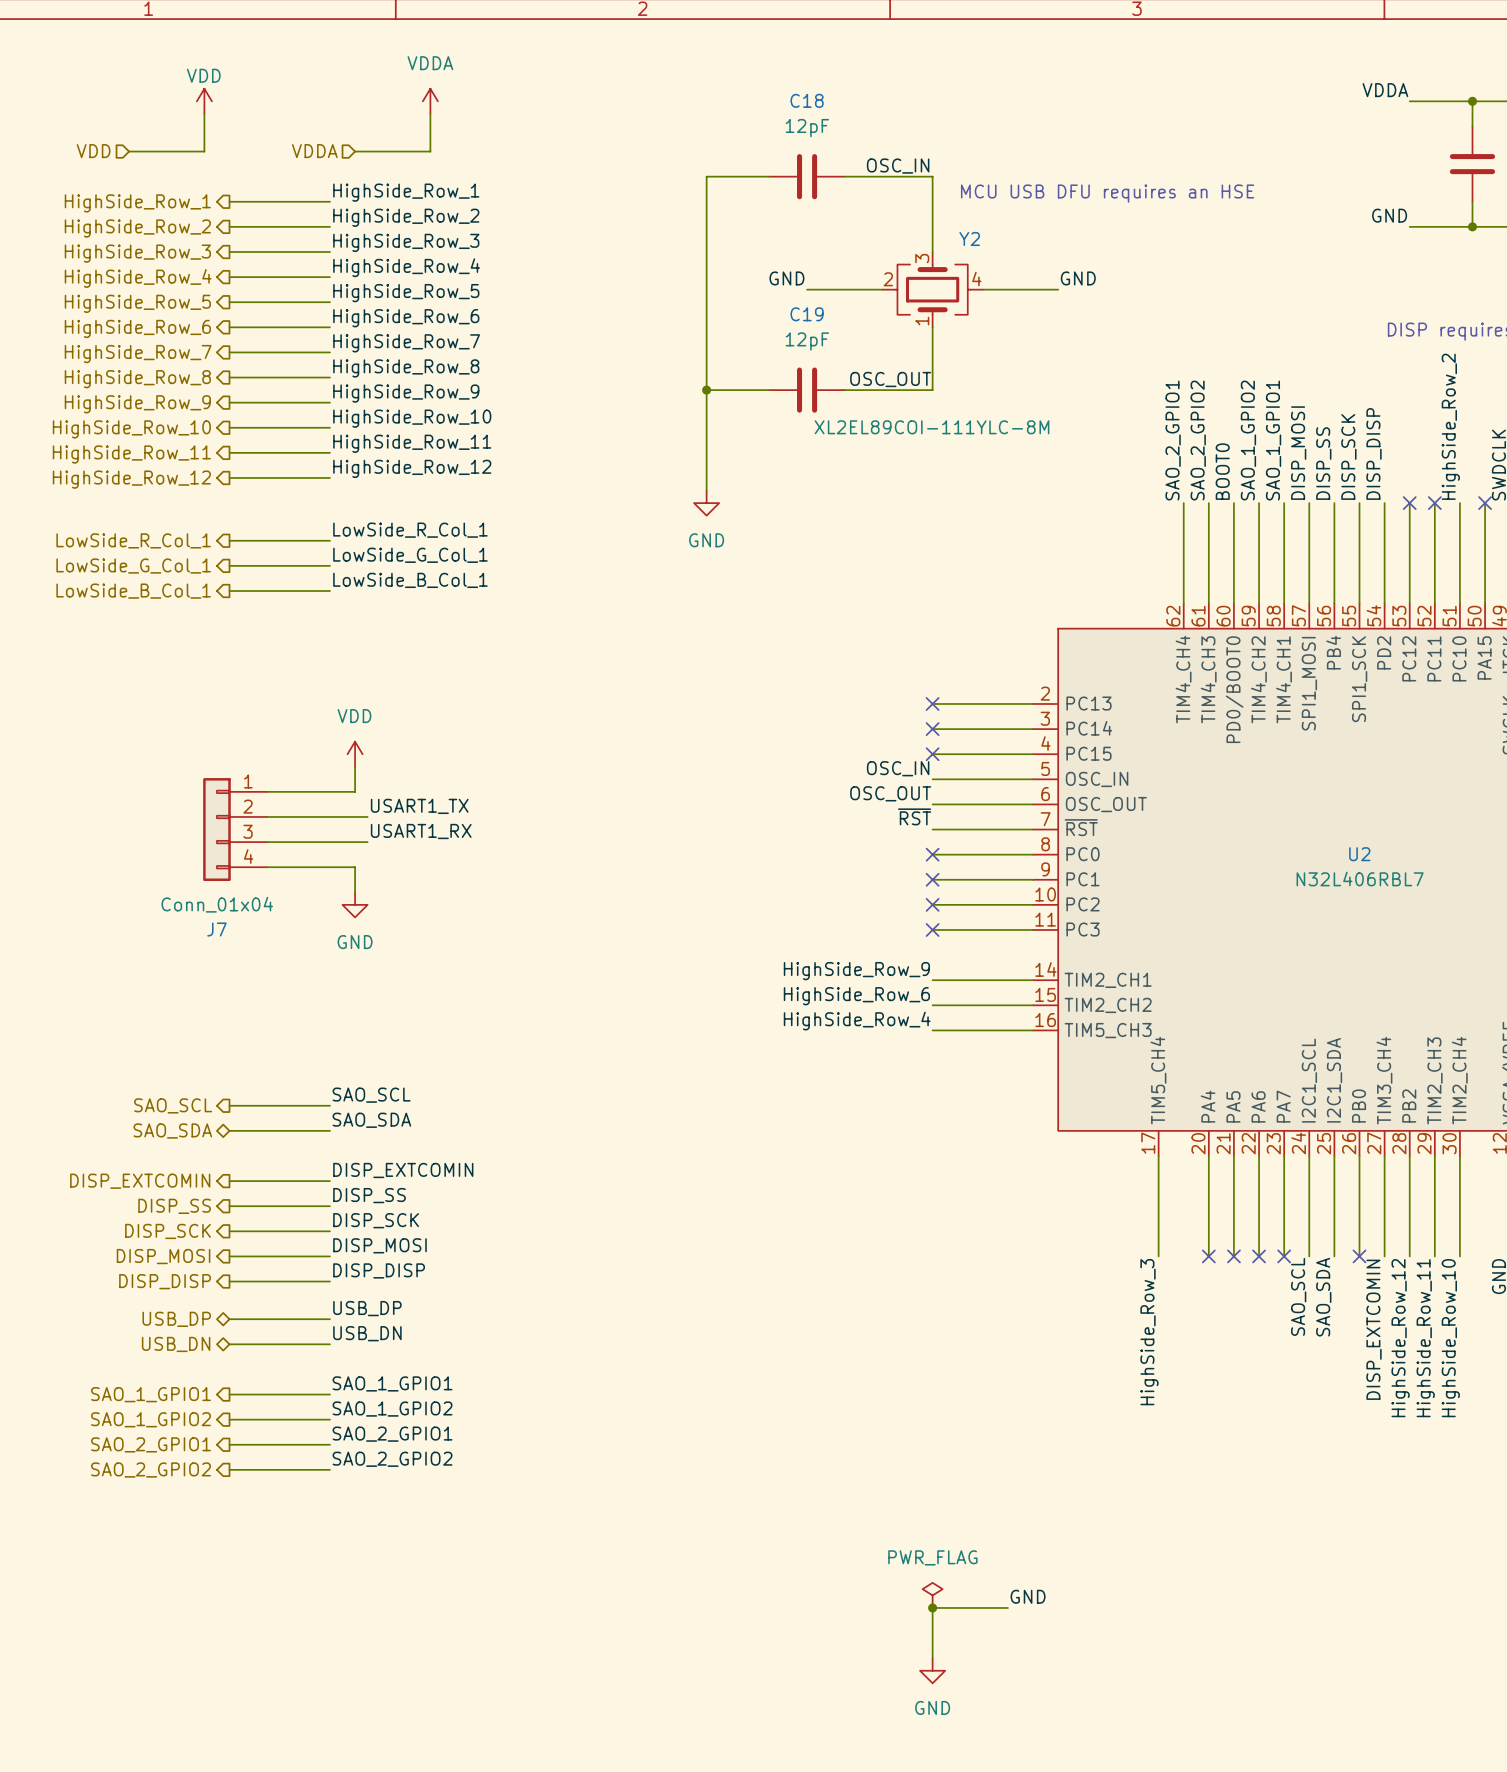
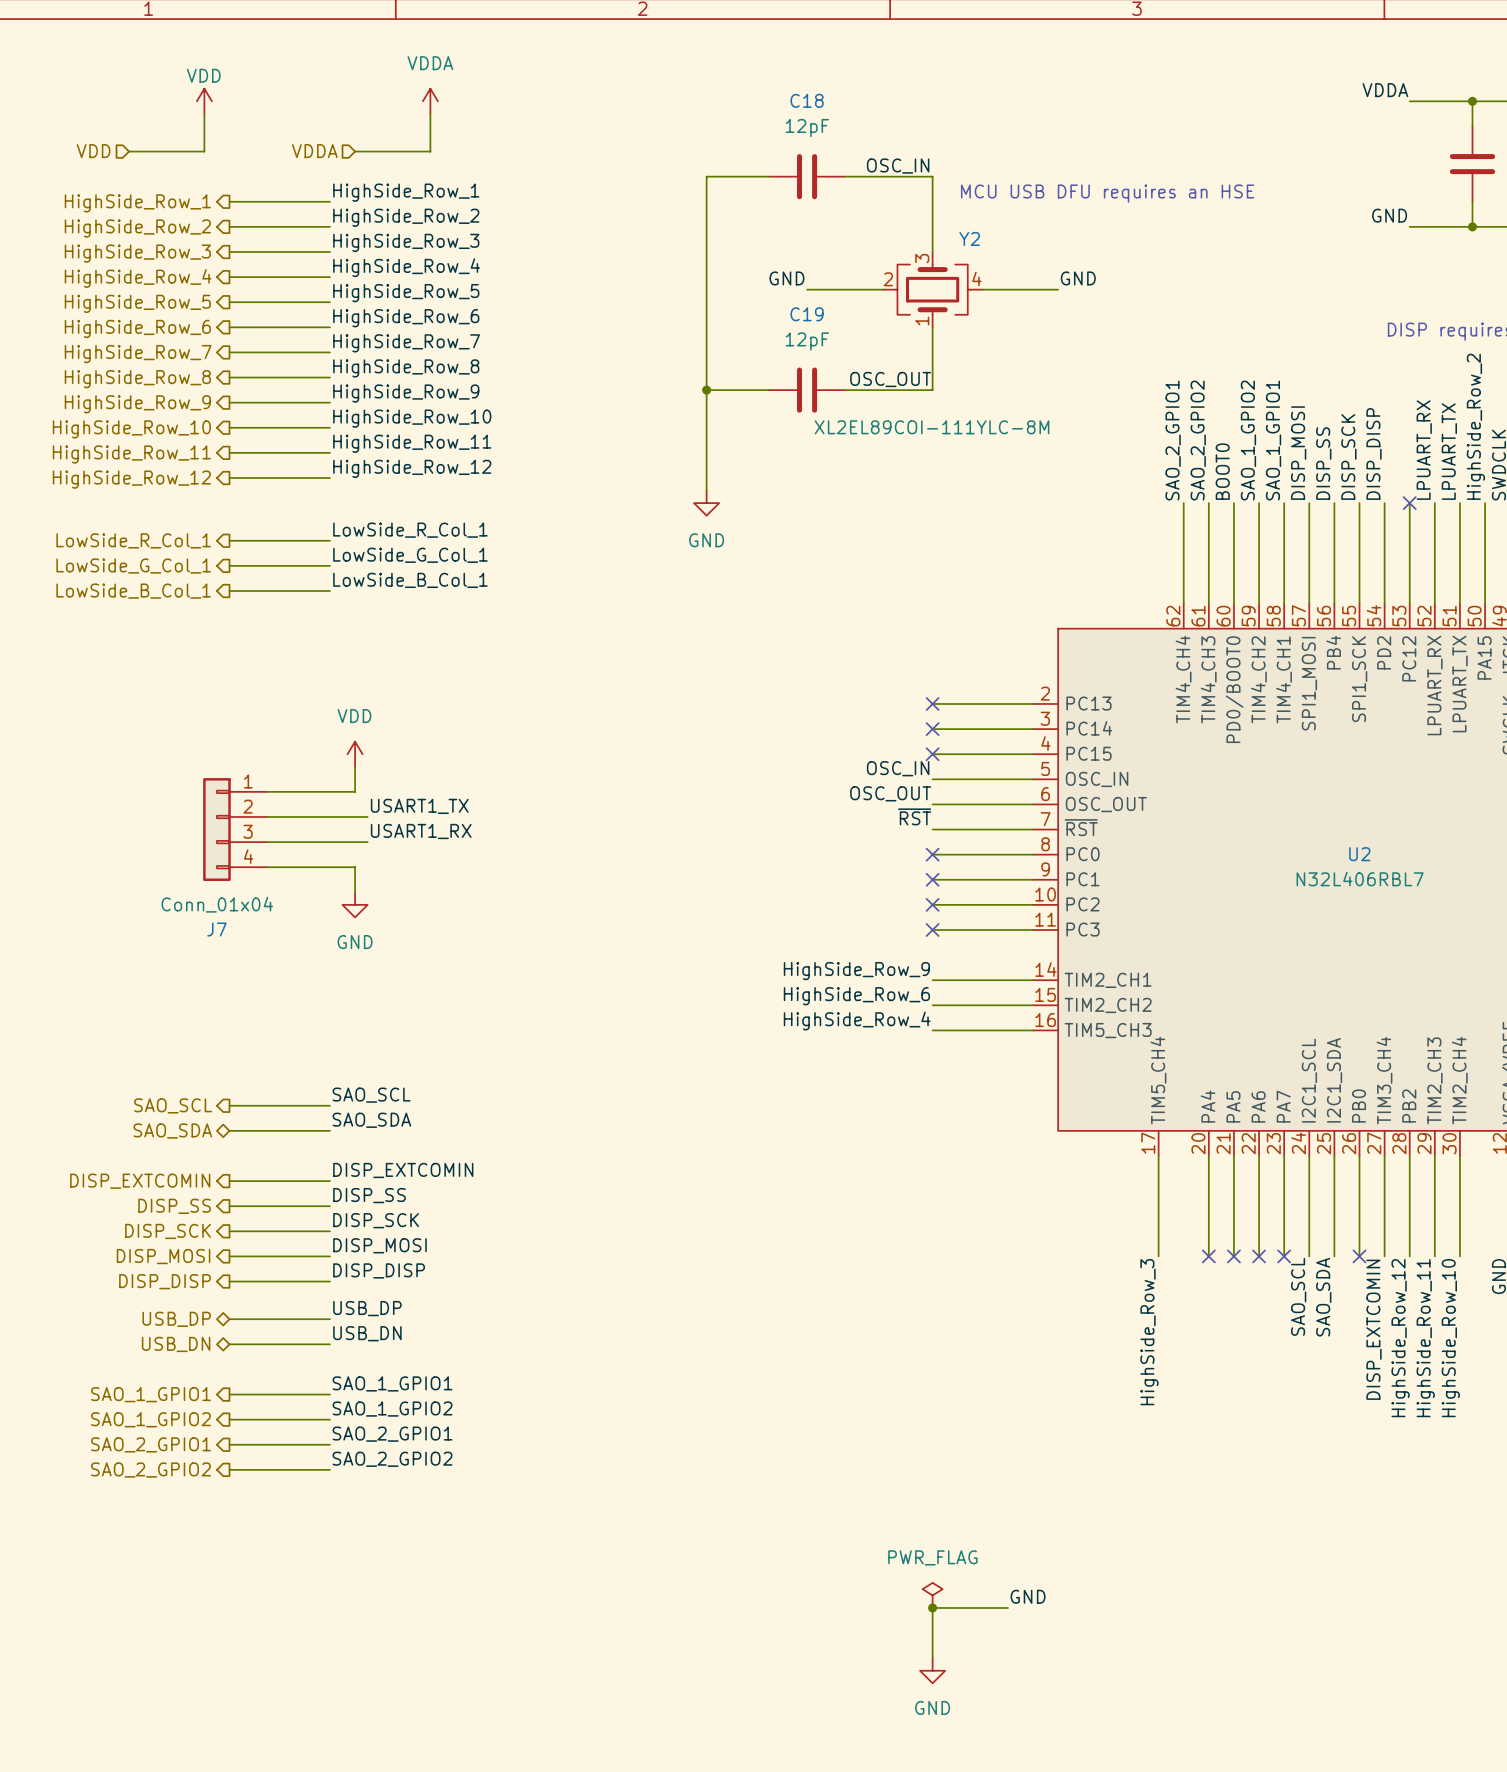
label: HighSide_Row_2 (1450, 426) -> LPUART_TX (1449, 451)
label: none -> HighSide_Row_2 (1475, 426)
label: none -> LPUART_RX (1424, 450)
no-connect mark: (1434, 503) -> none
no-connect mark: (1485, 503) -> none
U2 pin name: PC11 (1434, 658) -> LPUART_RX (1434, 685)
U2 pin name: PC10 (1459, 658) -> LPUART_TX (1460, 683)

